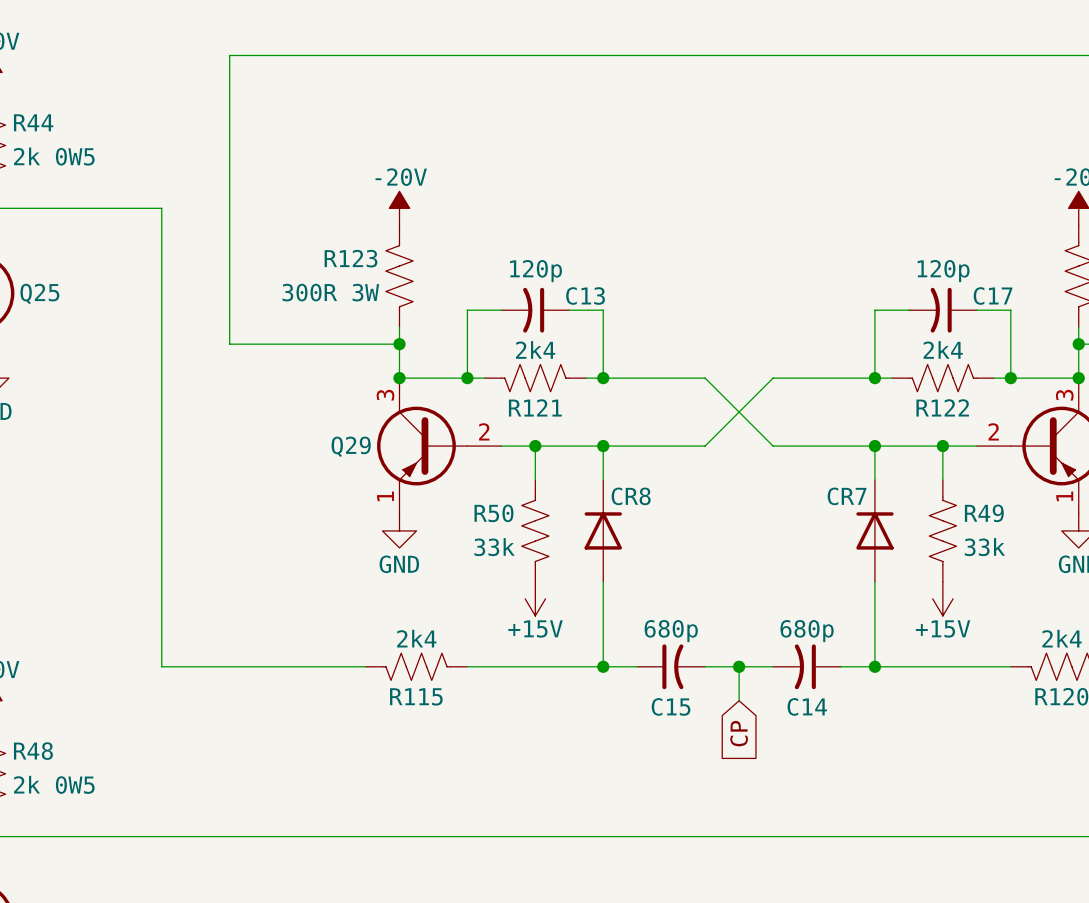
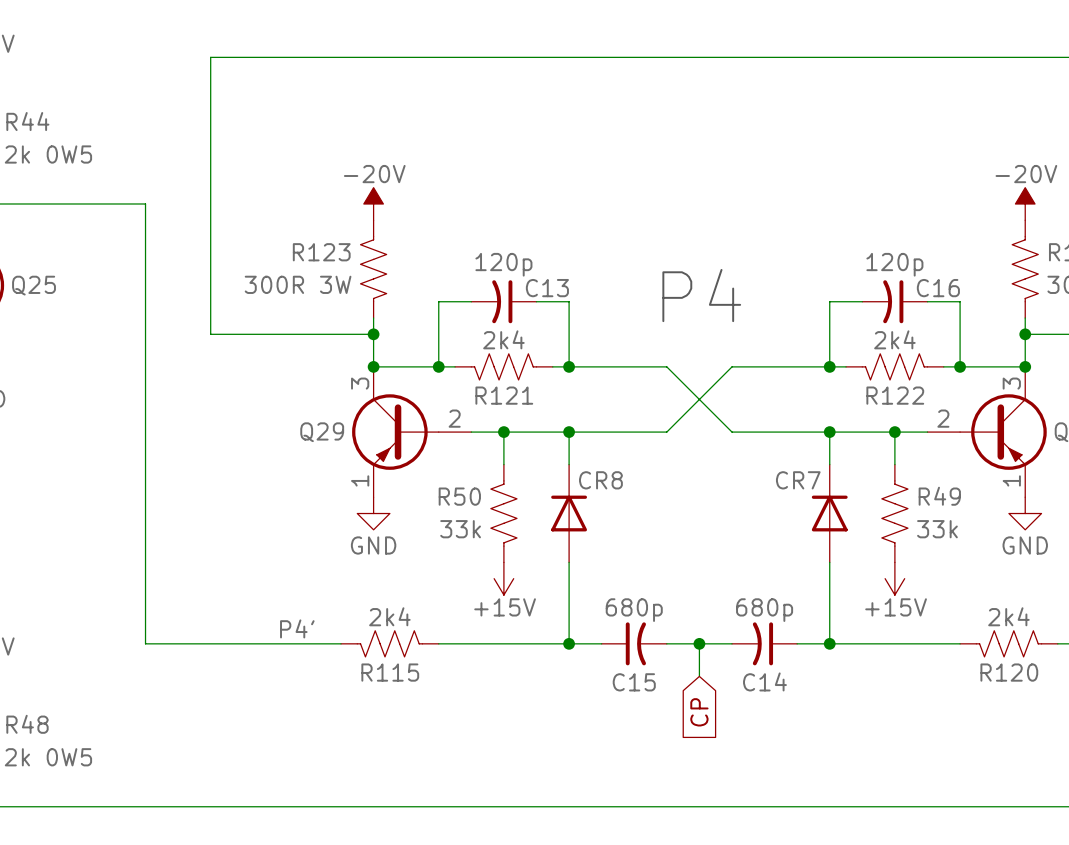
C17 name: C17 (993, 295) -> C16 (938, 288)
text: none -> P4 (701, 295)
label: none -> P4' (297, 628)

